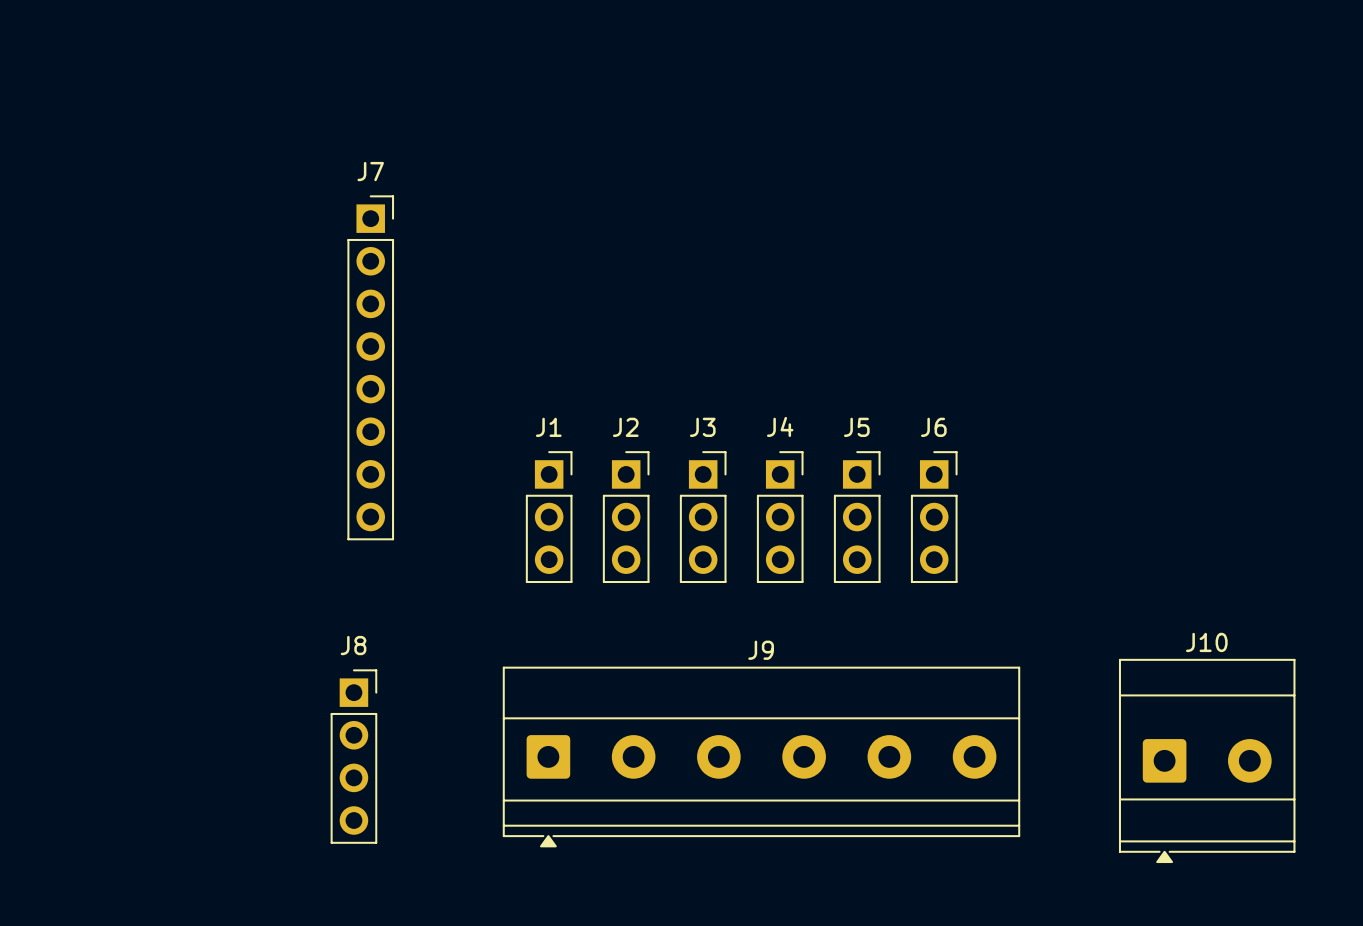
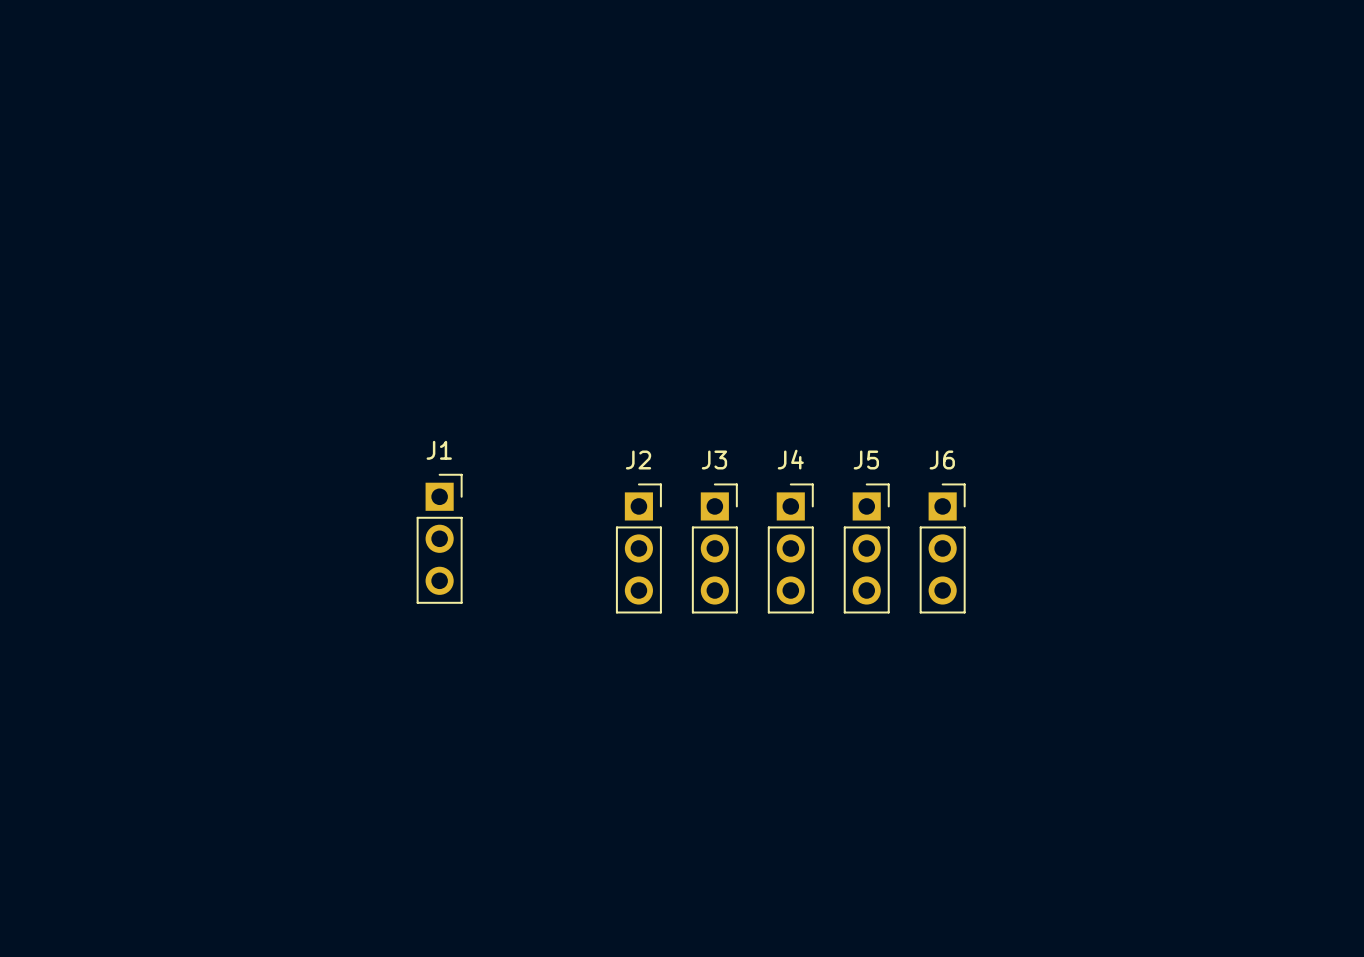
J7: (370, 367) -> none
J1 position: (549, 517) -> (439, 538)
J8: (353, 756) -> none
J9: (761, 757) -> none
J10: (1207, 760) -> none

